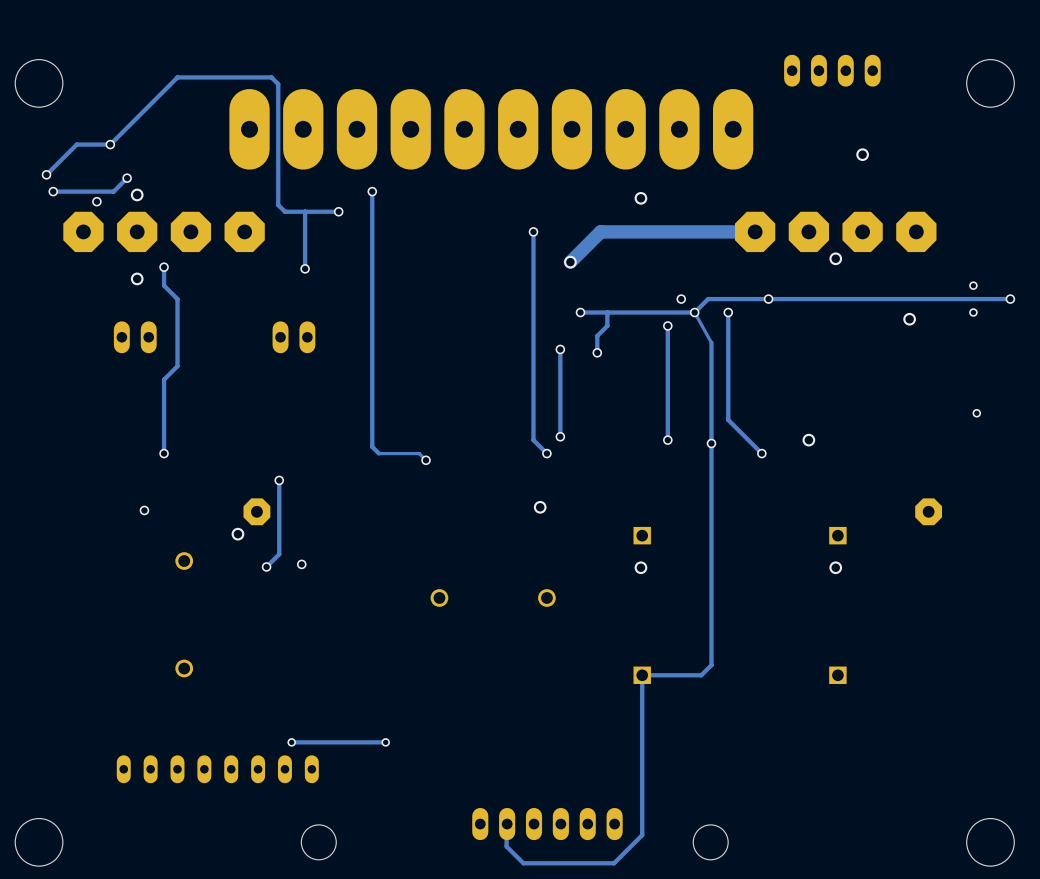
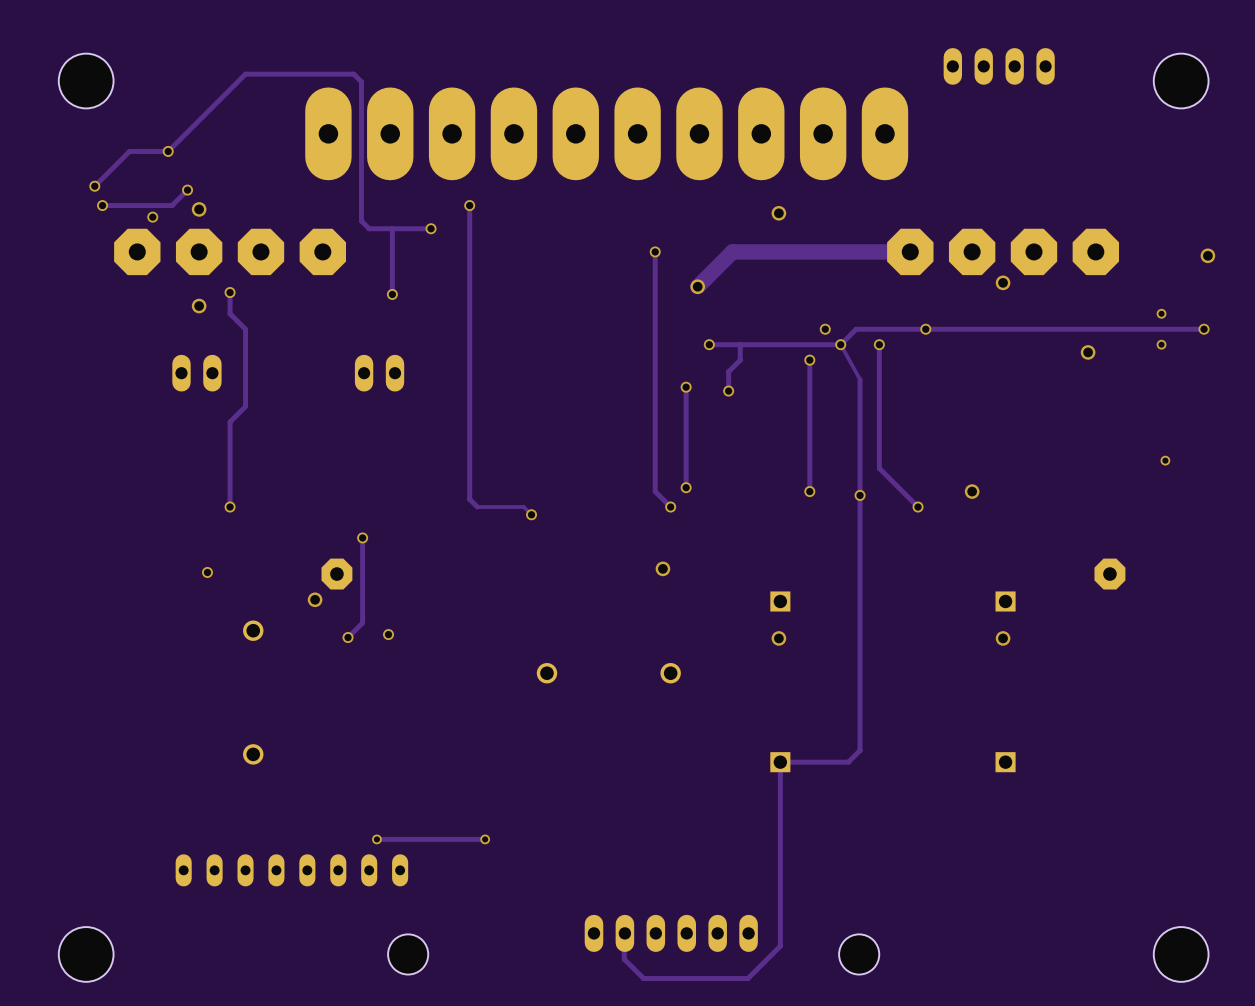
via: (862, 154) -> none
via: none -> (1207, 255)

